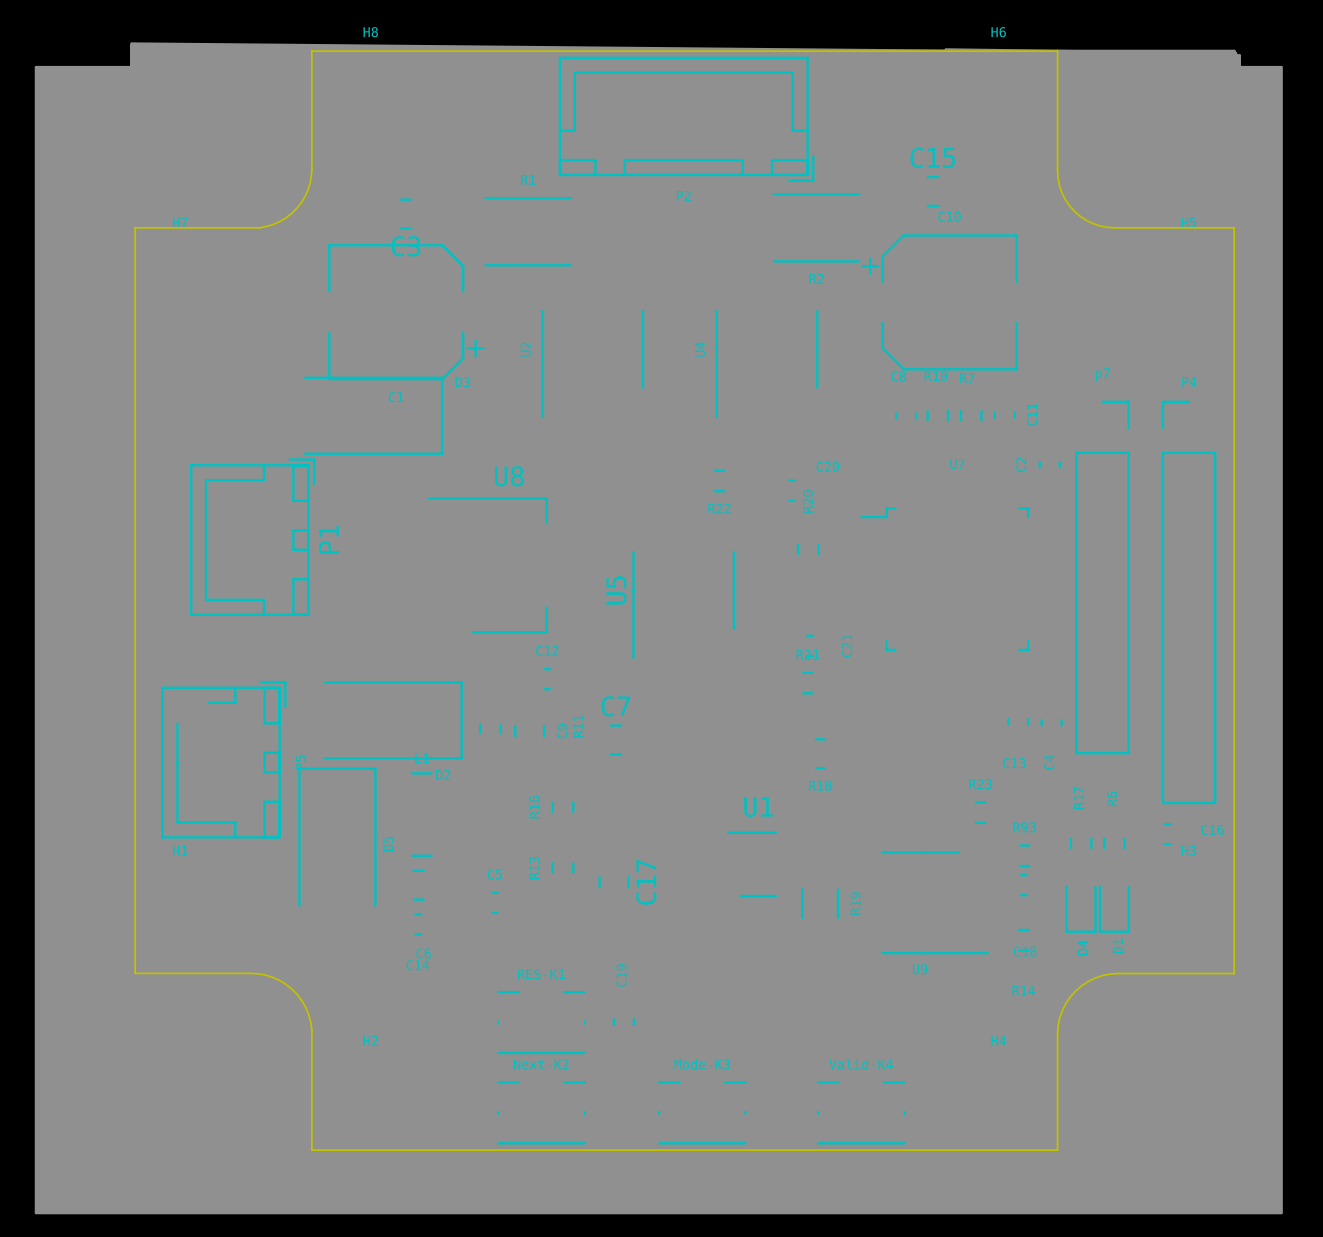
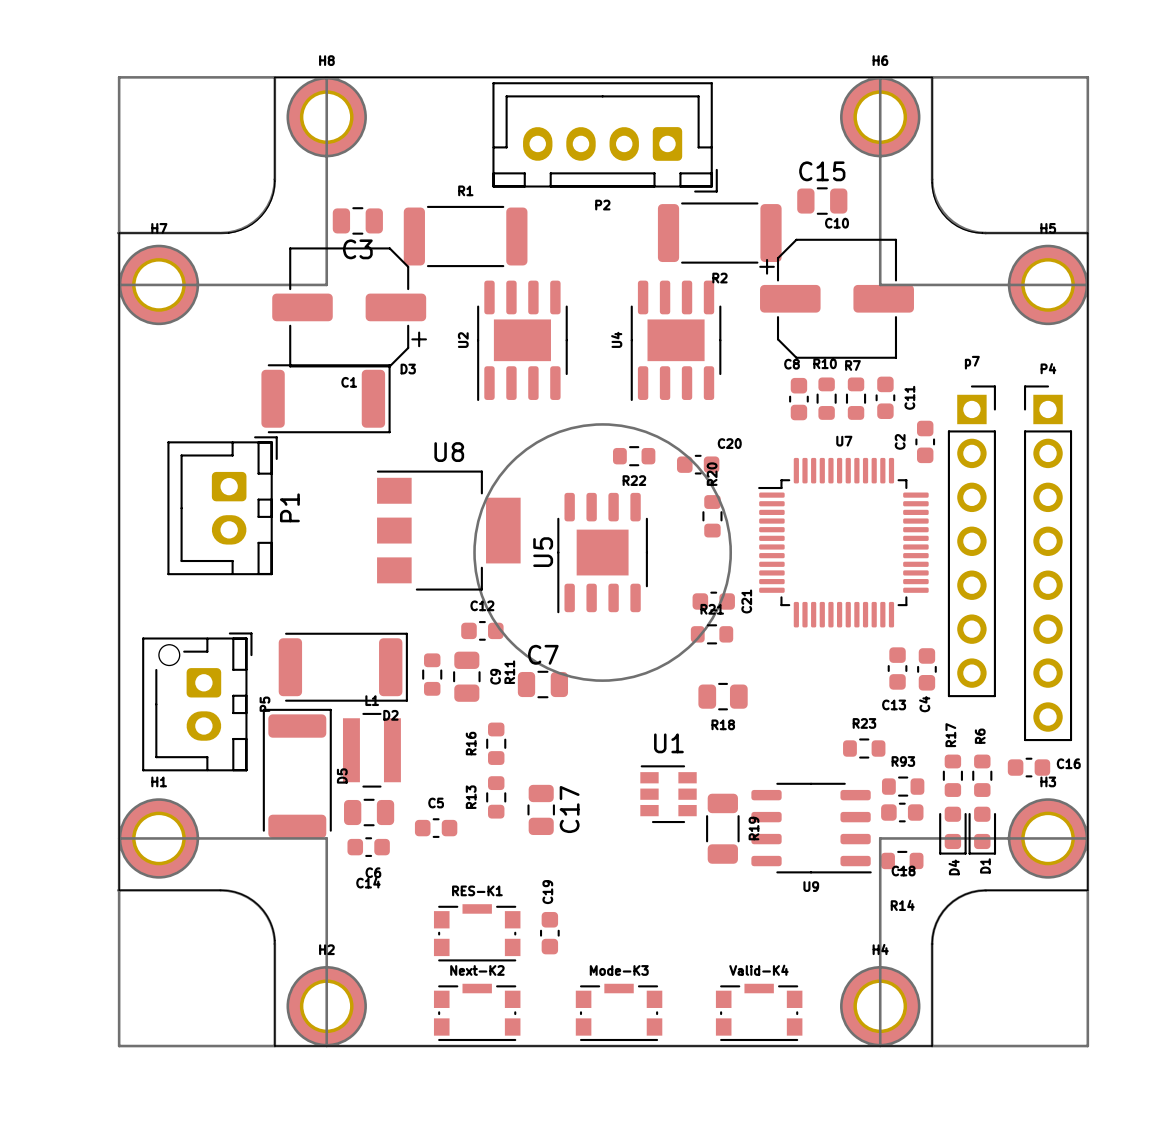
drawing: [34, 42, 1283, 1215] -> none

